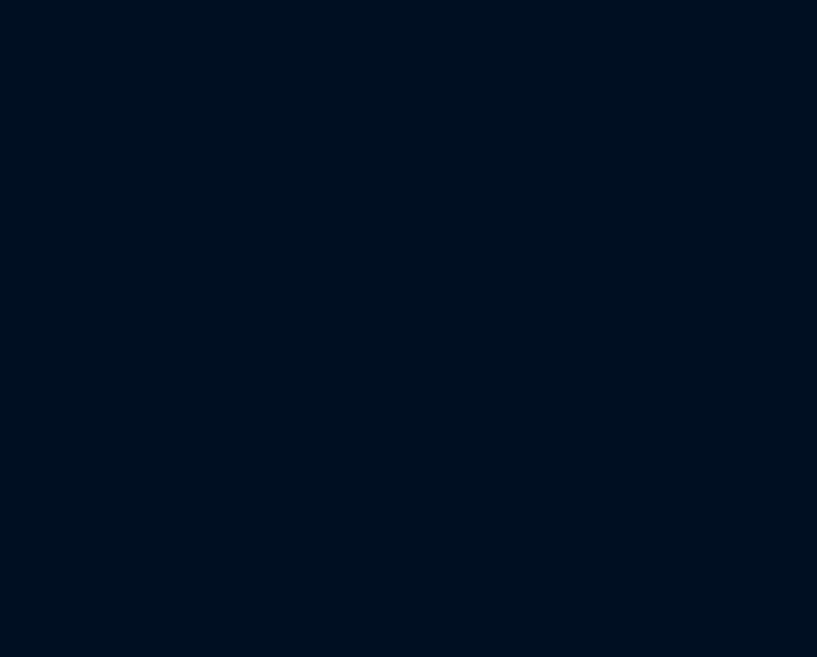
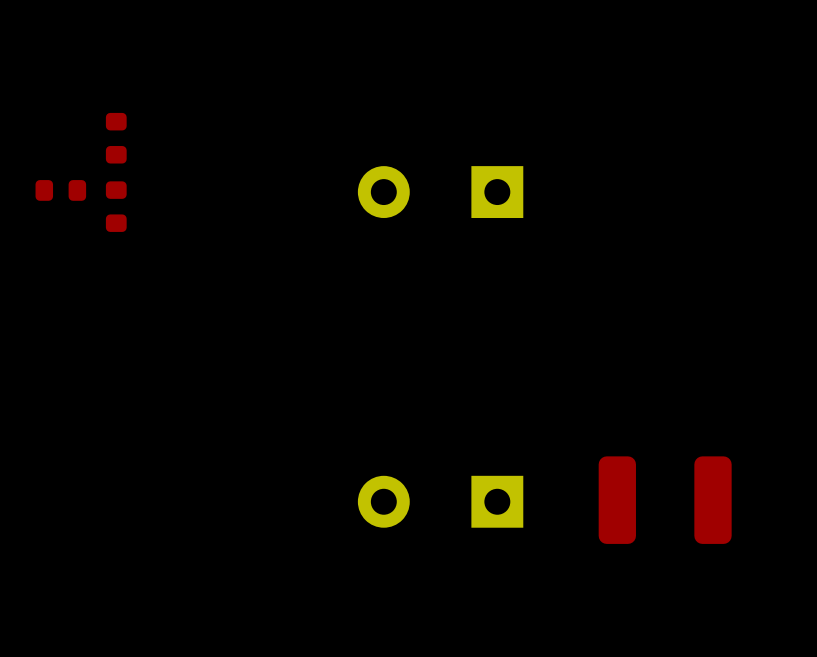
part: none -> (116, 138)
part: none -> (60, 190)
part: none -> (440, 192)
part: none -> (116, 206)
part: none -> (665, 500)
part: none -> (440, 501)

